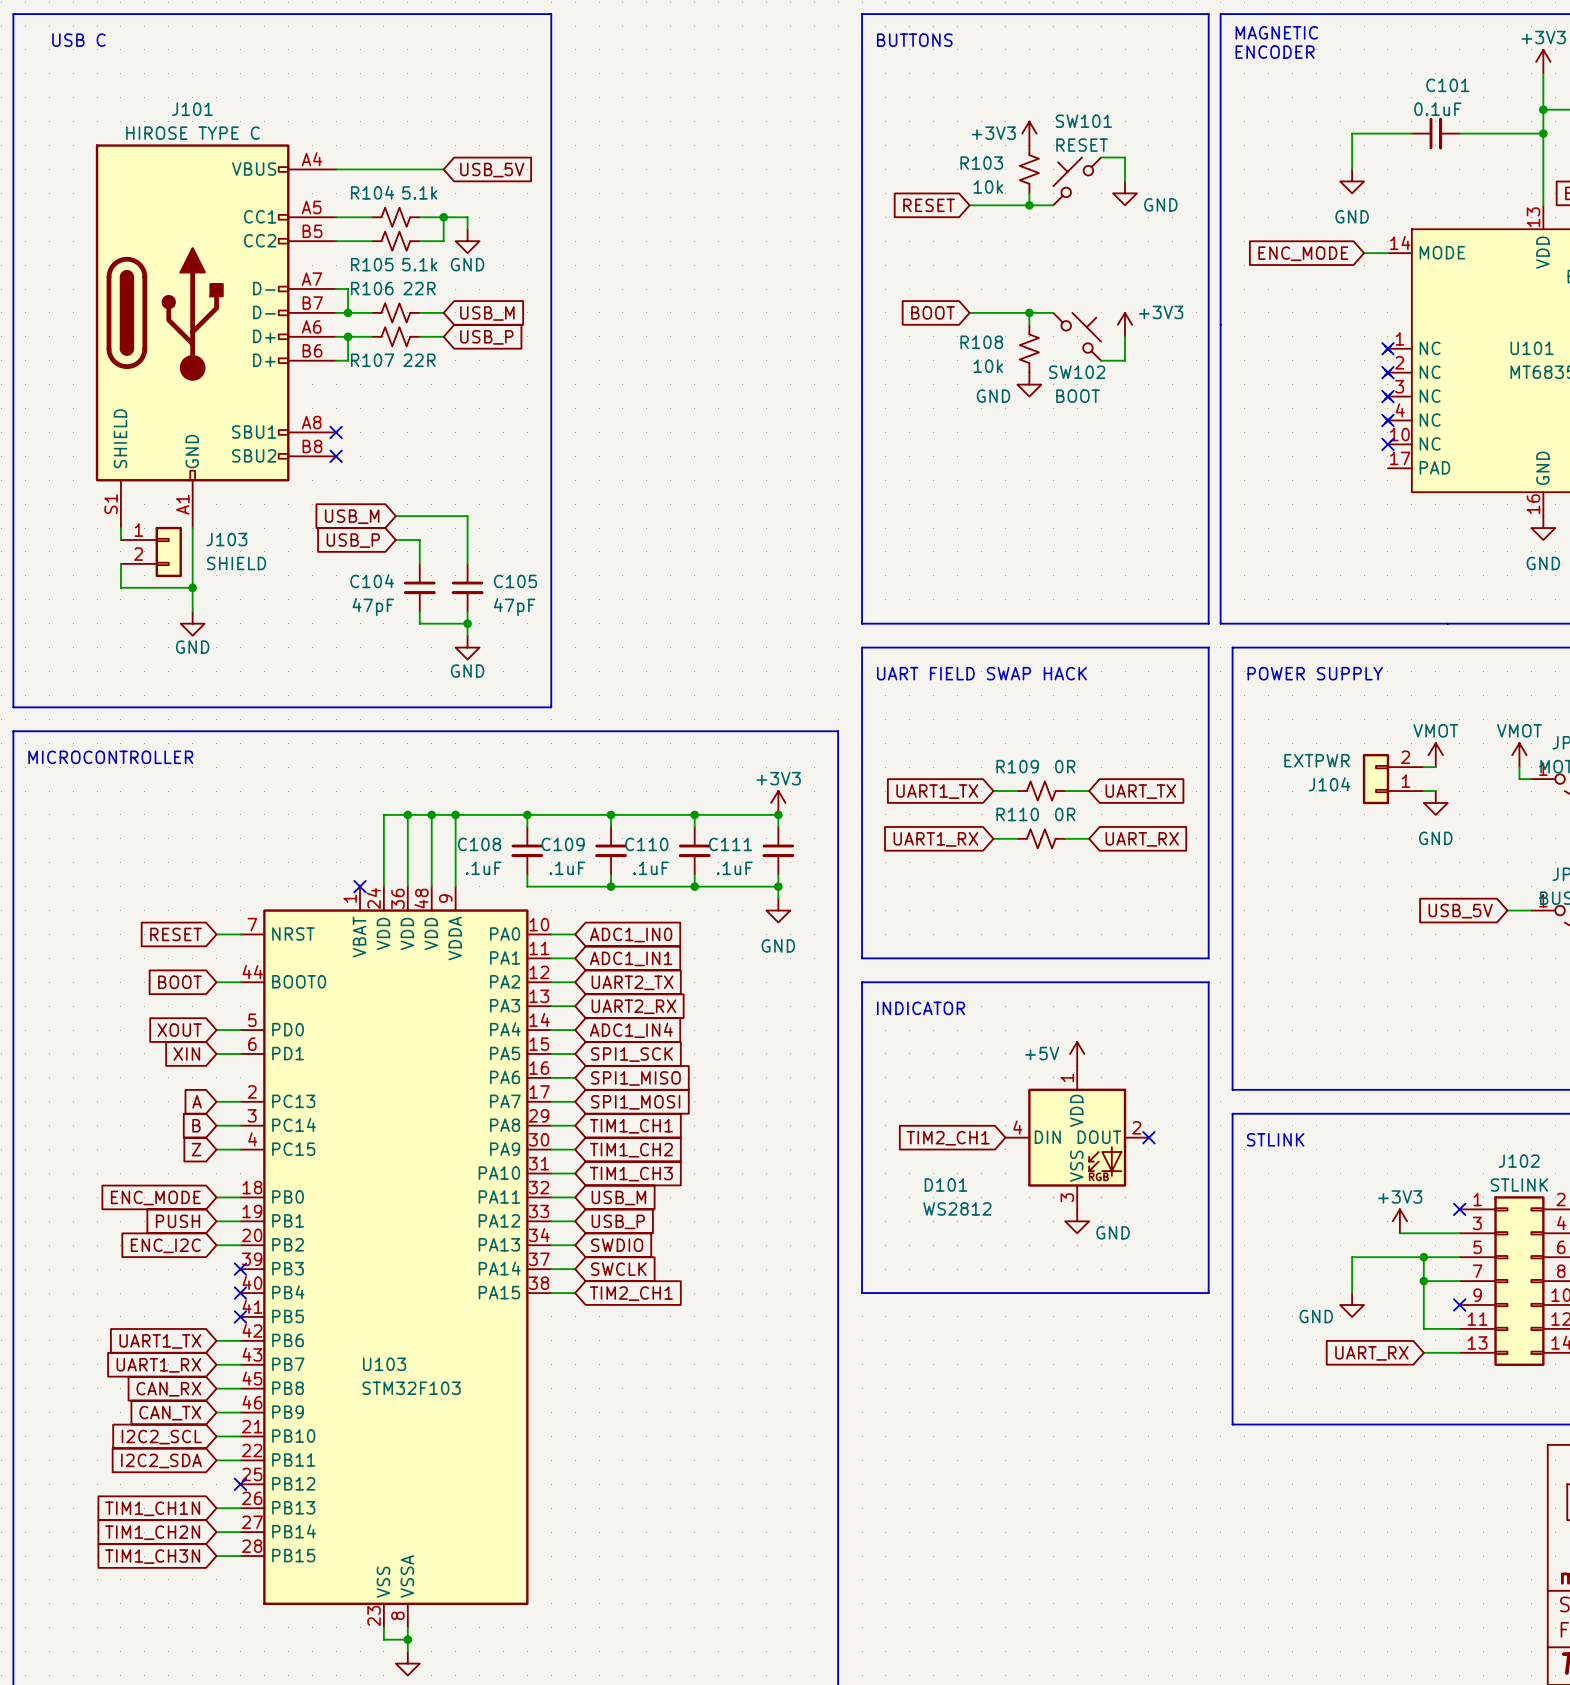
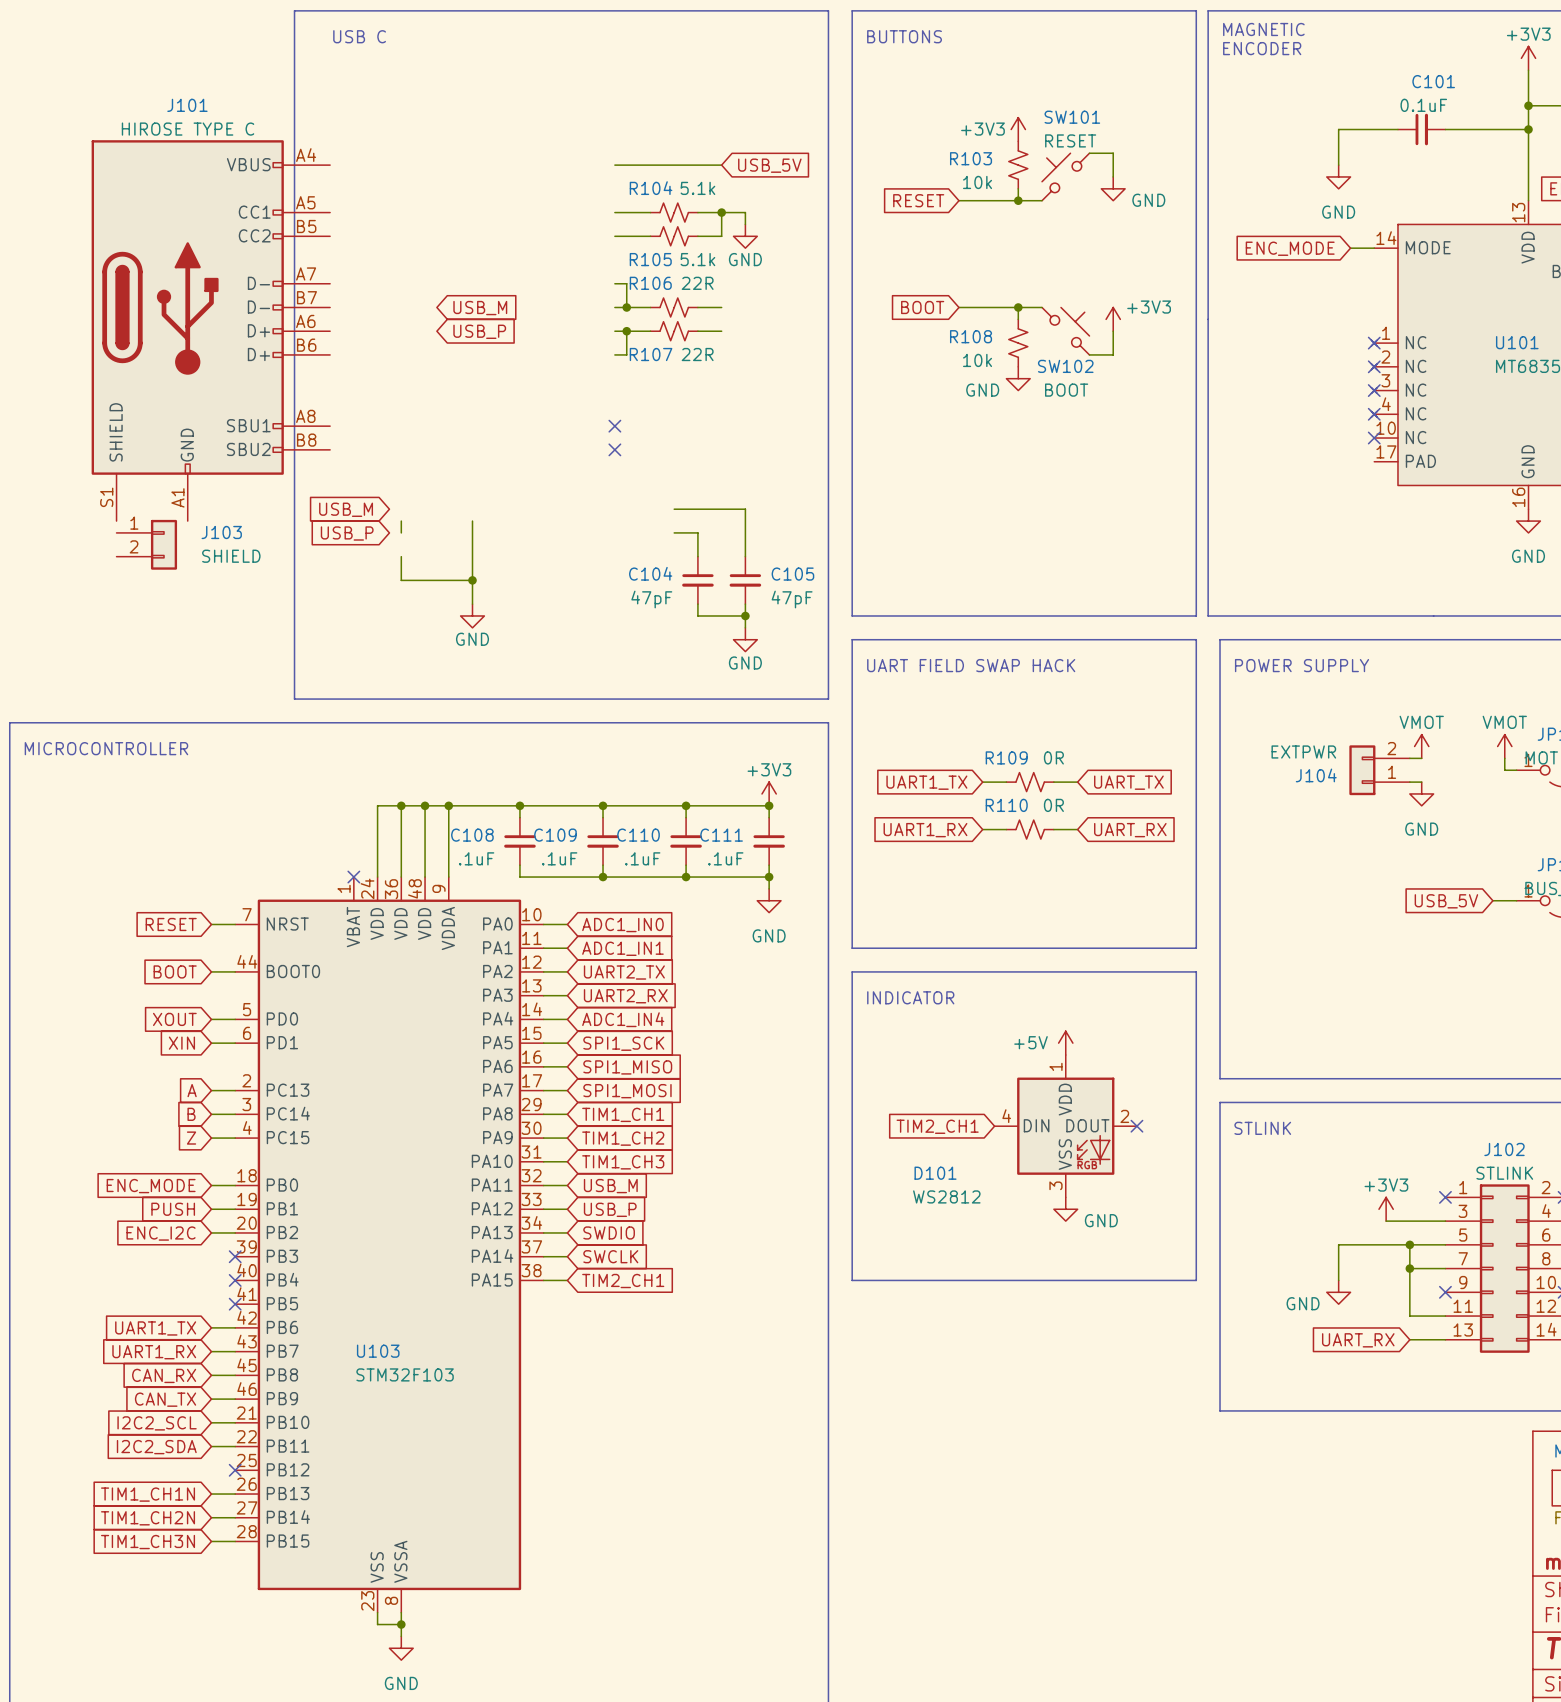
line: (300, 14) (13, 14) (13, 707) (300, 707) -> (294, 10) (294, 699)
line: (551, 14) (551, 707) -> (543, 10) (828, 10) (828, 699) (543, 699)
text: USB C (78, 40) -> none
text: none -> USB C (359, 36)
wire: (336, 169) (443, 169) -> none
wire: none -> (614, 165) (721, 165)
global label: USB_5V (492, 170) -> none
global label: none -> USB_5V (769, 165)
wire: (336, 217) (371, 217) -> none
R104 position: (395, 217) -> (674, 212)
wire: (419, 217) (467, 217) (467, 229) -> none
wire: (443, 217) (443, 241) (419, 241) -> none
junction: (443, 217) -> none
wire: none -> (614, 212) (650, 212)
wire: none -> (697, 212) (745, 212) (745, 224)
wire: none -> (721, 212) (721, 236) (697, 236)
junction: none -> (721, 212)
wire: (336, 241) (371, 241) -> none
R105 position: (395, 241) -> (674, 236)
power symbol: GND (467, 241) -> none
wire: none -> (614, 236) (650, 236)
power symbol: none -> GND (745, 236)
wire: (336, 289) (348, 289) (348, 312) -> none
wire: none -> (614, 283) (626, 283) (626, 307)
wire: (336, 312) (371, 312) -> none
junction: (348, 312) -> none
R106 position: (395, 312) -> (674, 307)
wire: (419, 312) (443, 312) -> none
wire: none -> (614, 307) (650, 307)
junction: none -> (626, 307)
wire: none -> (697, 307) (721, 307)
wire: (336, 336) (371, 336) -> none
wire: (348, 336) (348, 360) (336, 360) -> none
junction: (348, 336) -> none
R107 position: (395, 336) -> (674, 331)
wire: (419, 336) (443, 336) -> none
wire: none -> (614, 331) (650, 331)
wire: none -> (626, 331) (626, 354) (614, 354)
junction: none -> (626, 331)
wire: none -> (697, 331) (721, 331)
no-connect mark: (336, 432) -> none
no-connect mark: none -> (614, 426)
no-connect mark: (336, 456) -> none
no-connect mark: none -> (614, 449)
wire: (395, 516) (467, 516) (467, 563) -> none
wire: none -> (674, 509) (745, 509) (745, 556)
wire: (120, 528) (120, 540) -> none
wire: (192, 528) (192, 611) -> none
wire: none -> (401, 521) (401, 532)
wire: none -> (472, 521) (472, 604)
wire: (395, 540) (419, 540) (419, 563) -> none
wire: none -> (674, 532) (697, 532) (697, 556)
wire: (120, 563) (120, 587) (192, 587) -> none
wire: none -> (401, 556) (401, 580) (472, 580)
junction: (192, 587) -> none
C104 position: (419, 587) -> (697, 580)
C105 position: (467, 587) -> (745, 580)
wire: (419, 611) (419, 623) (467, 623) -> none
wire: (467, 611) (467, 635) -> none
wire: none -> (697, 604) (697, 615) (745, 615)
wire: none -> (745, 604) (745, 627)
power symbol: GND (192, 623) -> none
junction position: (467, 623) -> (472, 580)
junction: none -> (745, 615)
power symbol position: GND (467, 647) -> GND (472, 615)
power symbol: none -> GND (745, 639)

